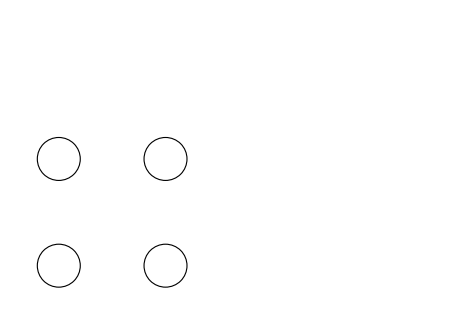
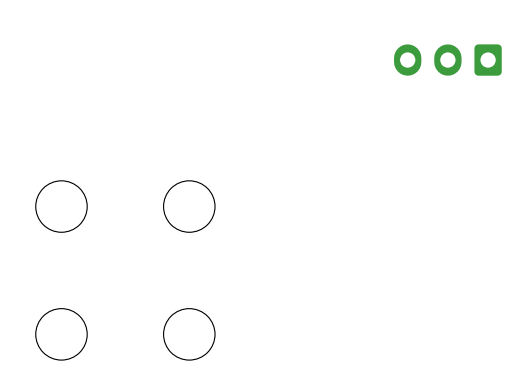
part: none -> (447, 60)

